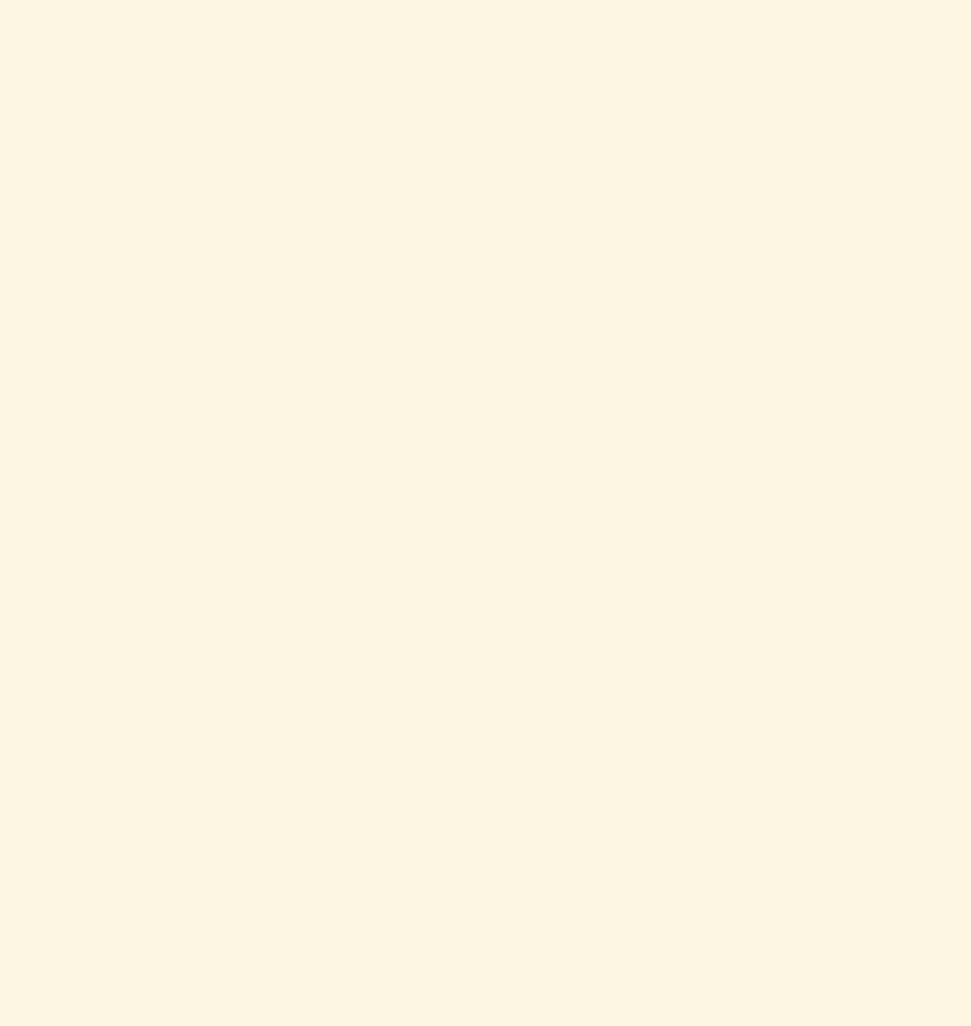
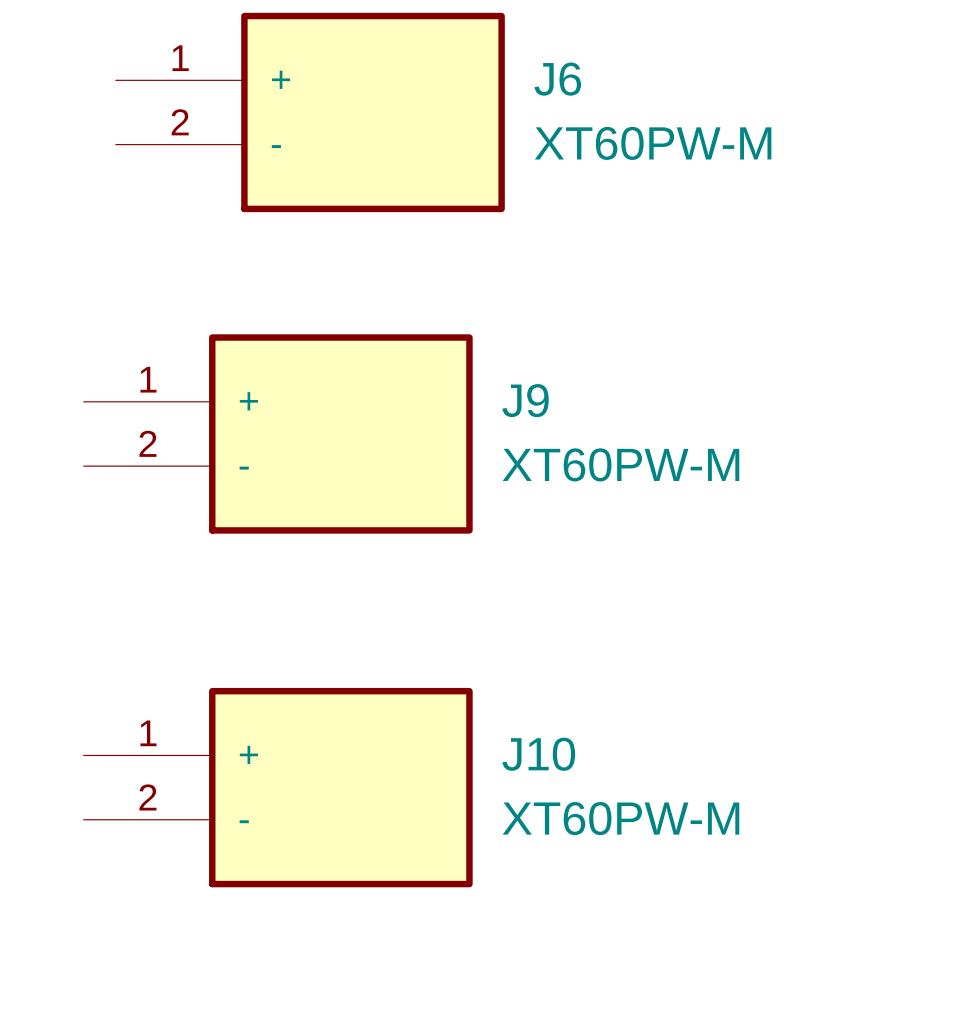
J6: none -> XT60PW-M (310, 112)
J9: none -> XT60PW-M (278, 433)
J10: none -> XT60PW-M (278, 787)

